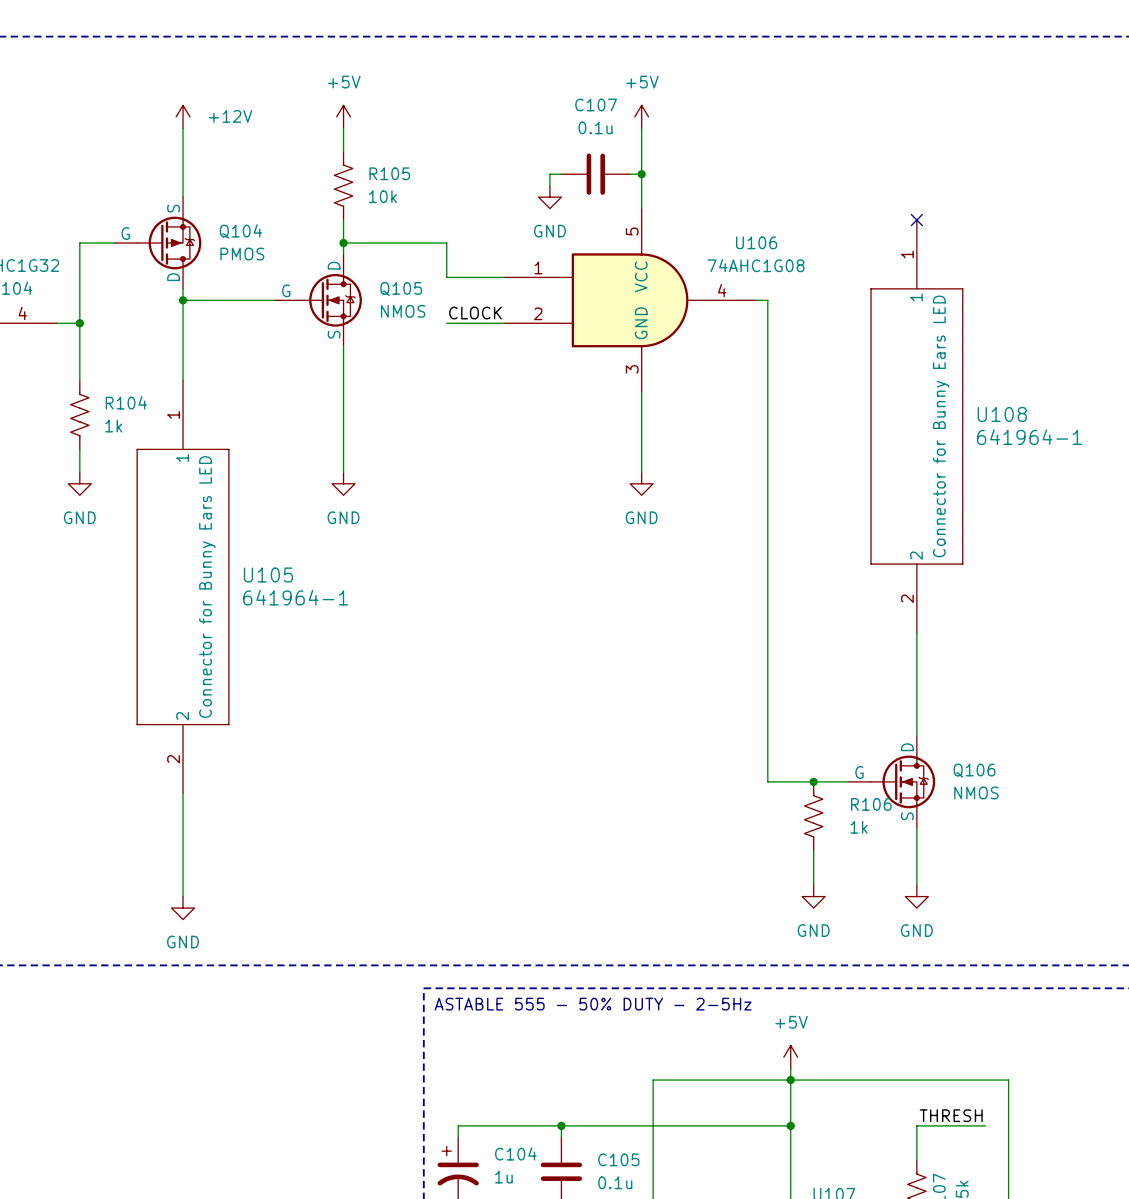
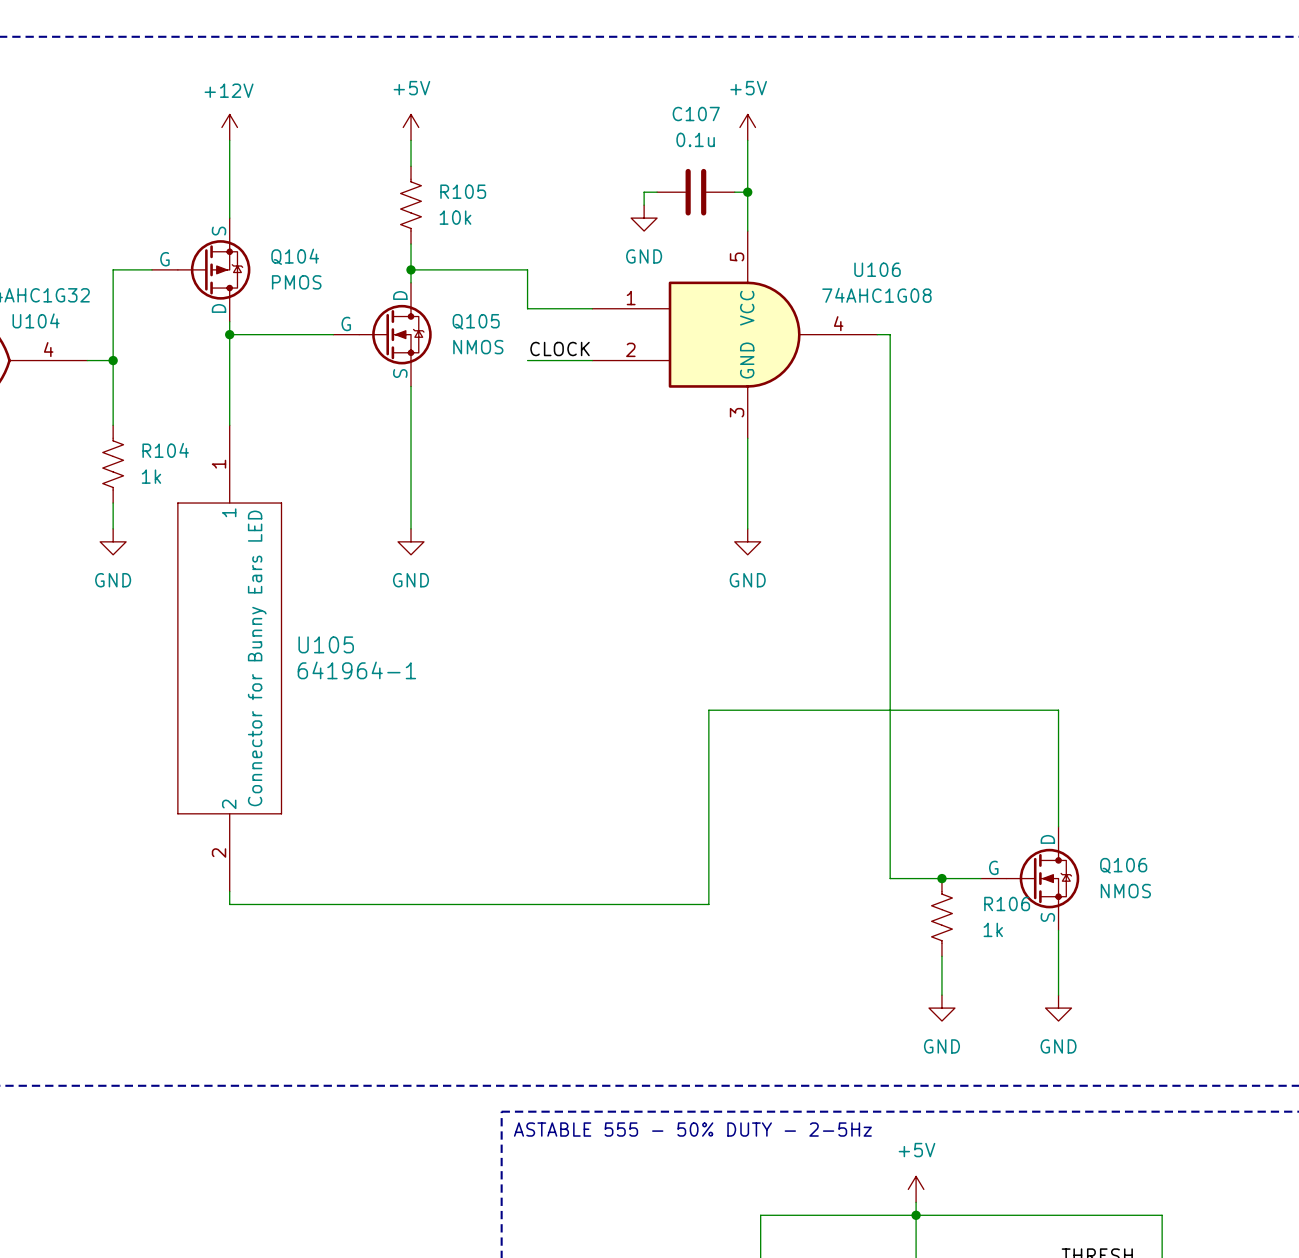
power symbol text position: +12V (230, 116) -> +12V (229, 90)
no-connect mark: (916, 220) -> none
U108: 641964-1 (916, 426) -> none
wire: (183, 804) (183, 896) -> (229, 904) (708, 904) (708, 710) (1058, 710)
power symbol: GND (183, 908) -> none

